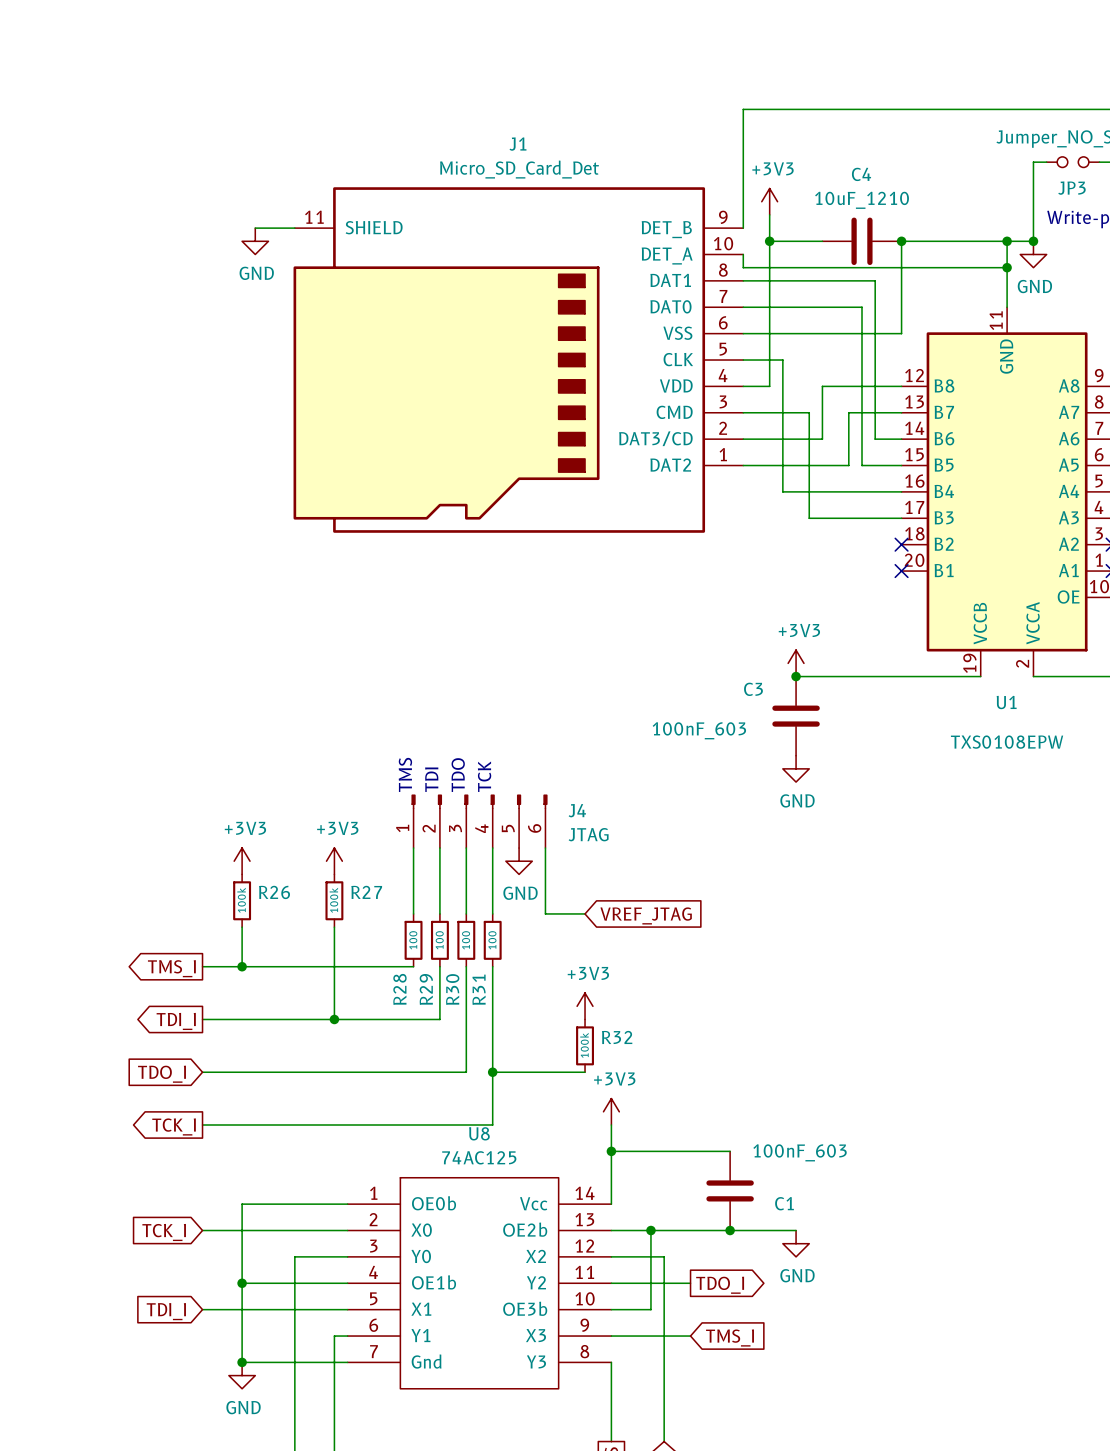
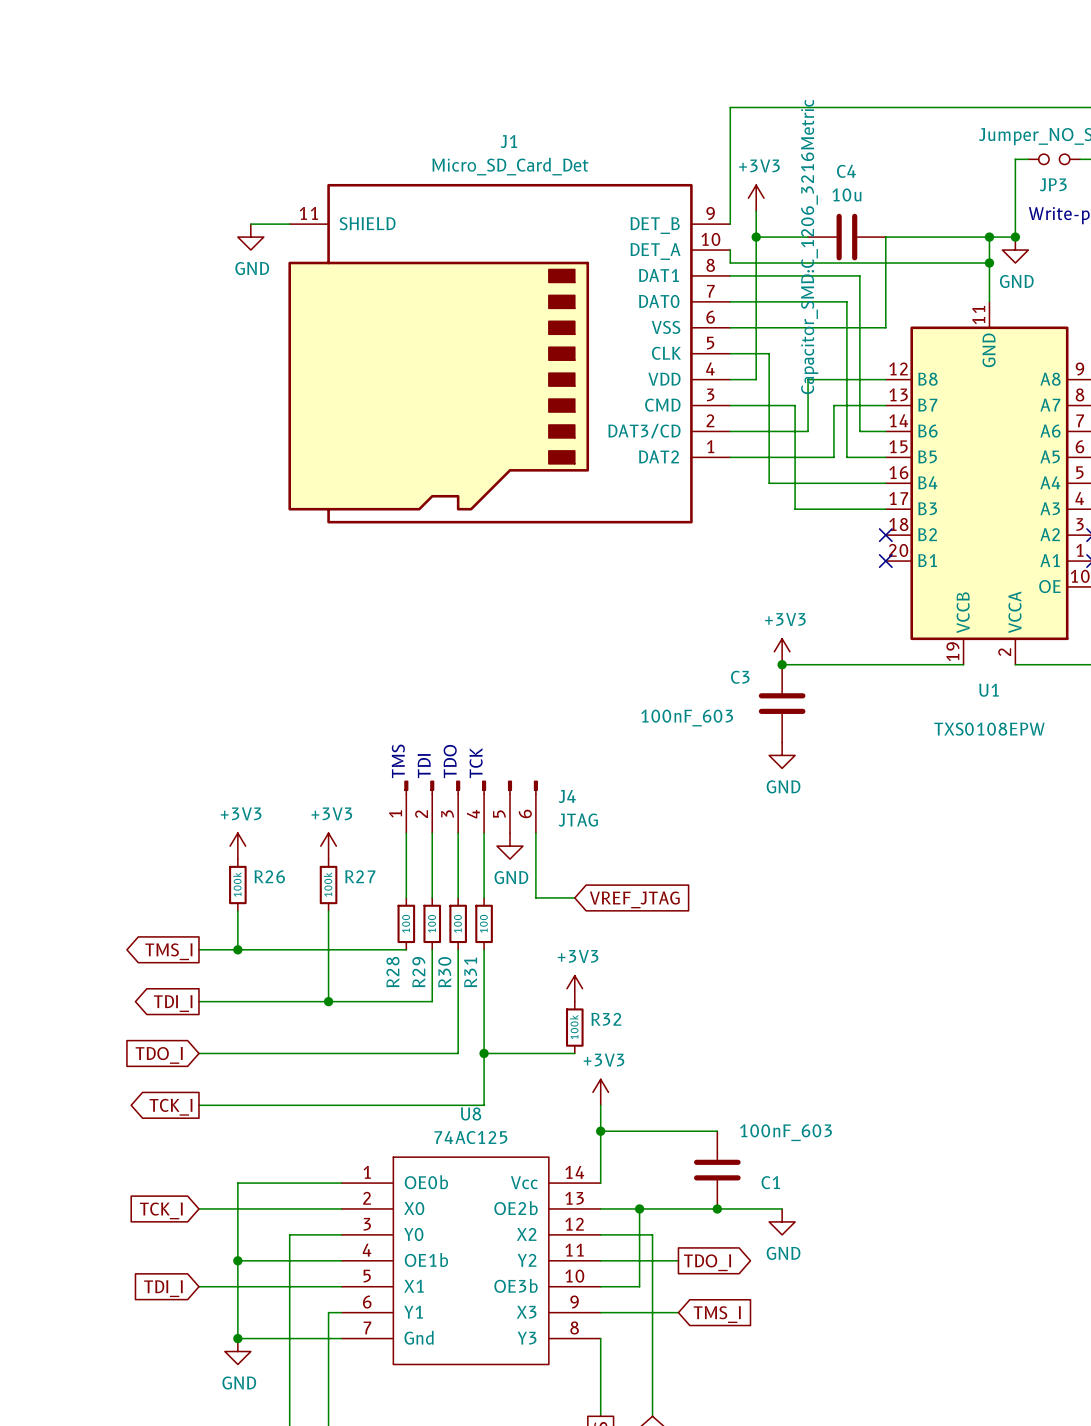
C4 value: 10uF_1210 (862, 200) -> 10u (846, 194)
junction: (901, 241) -> none
C4 text: none -> Capacitor_SMD:C_1206_3216Metric (809, 246)

